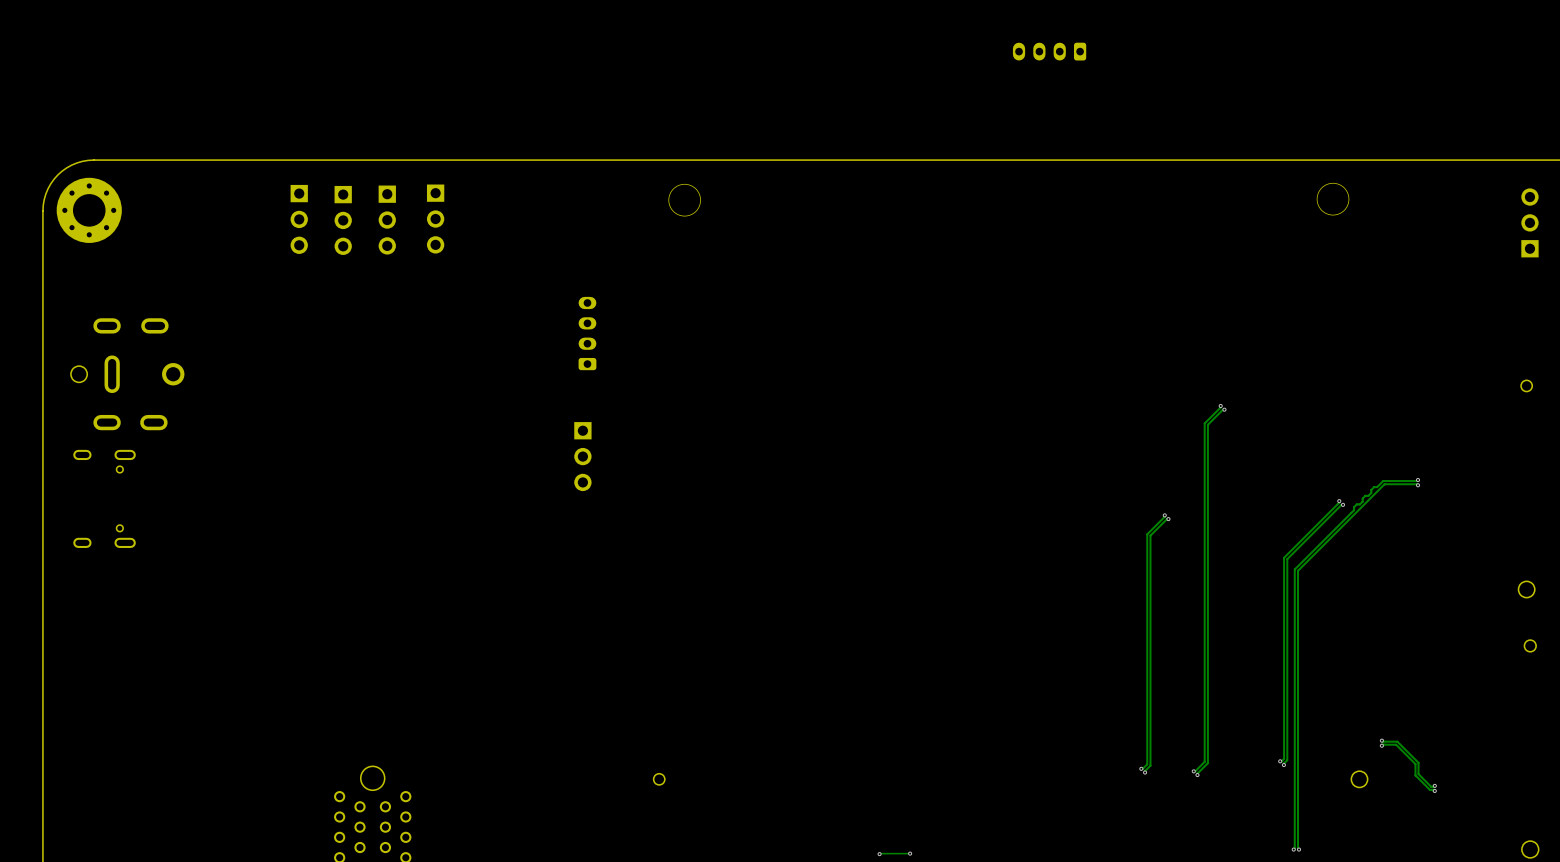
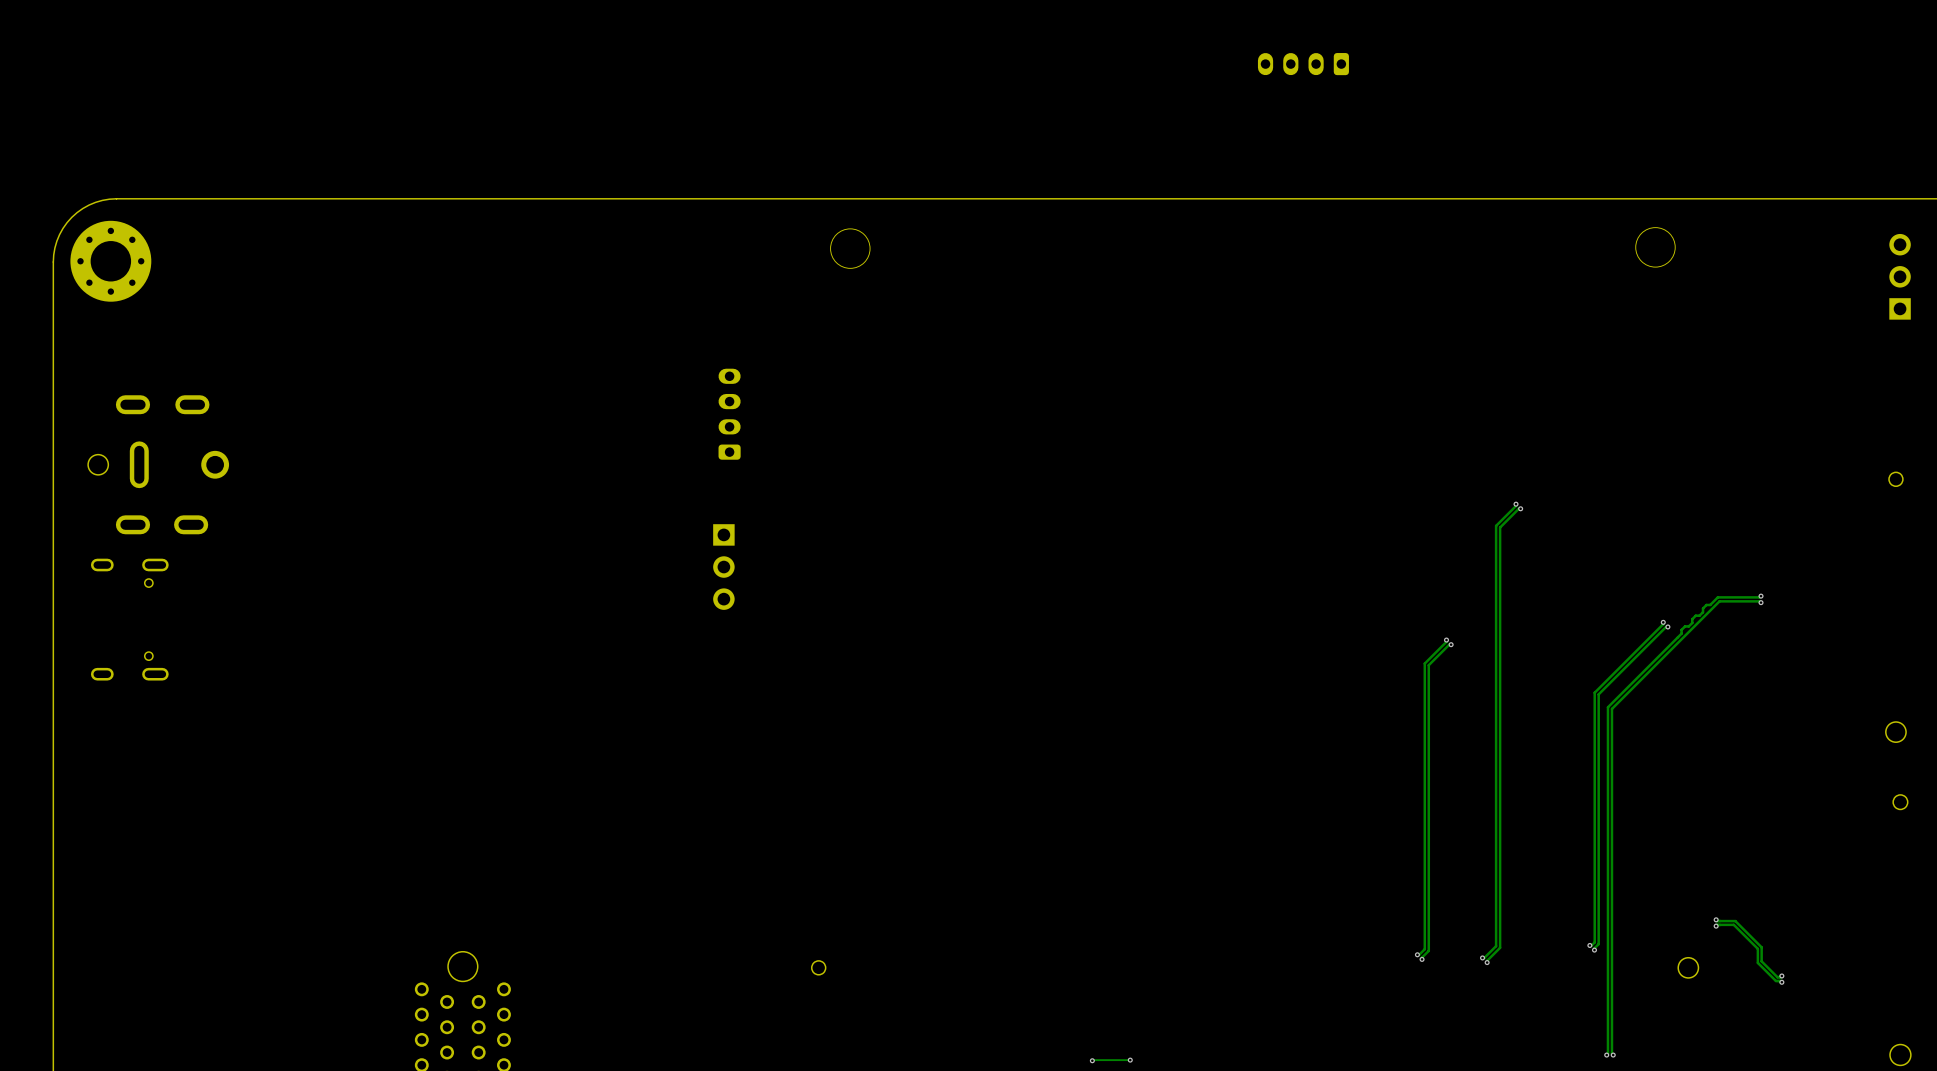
part: (299, 219) -> none
part: (435, 219) -> none
part: (343, 220) -> none
part: (387, 220) -> none

